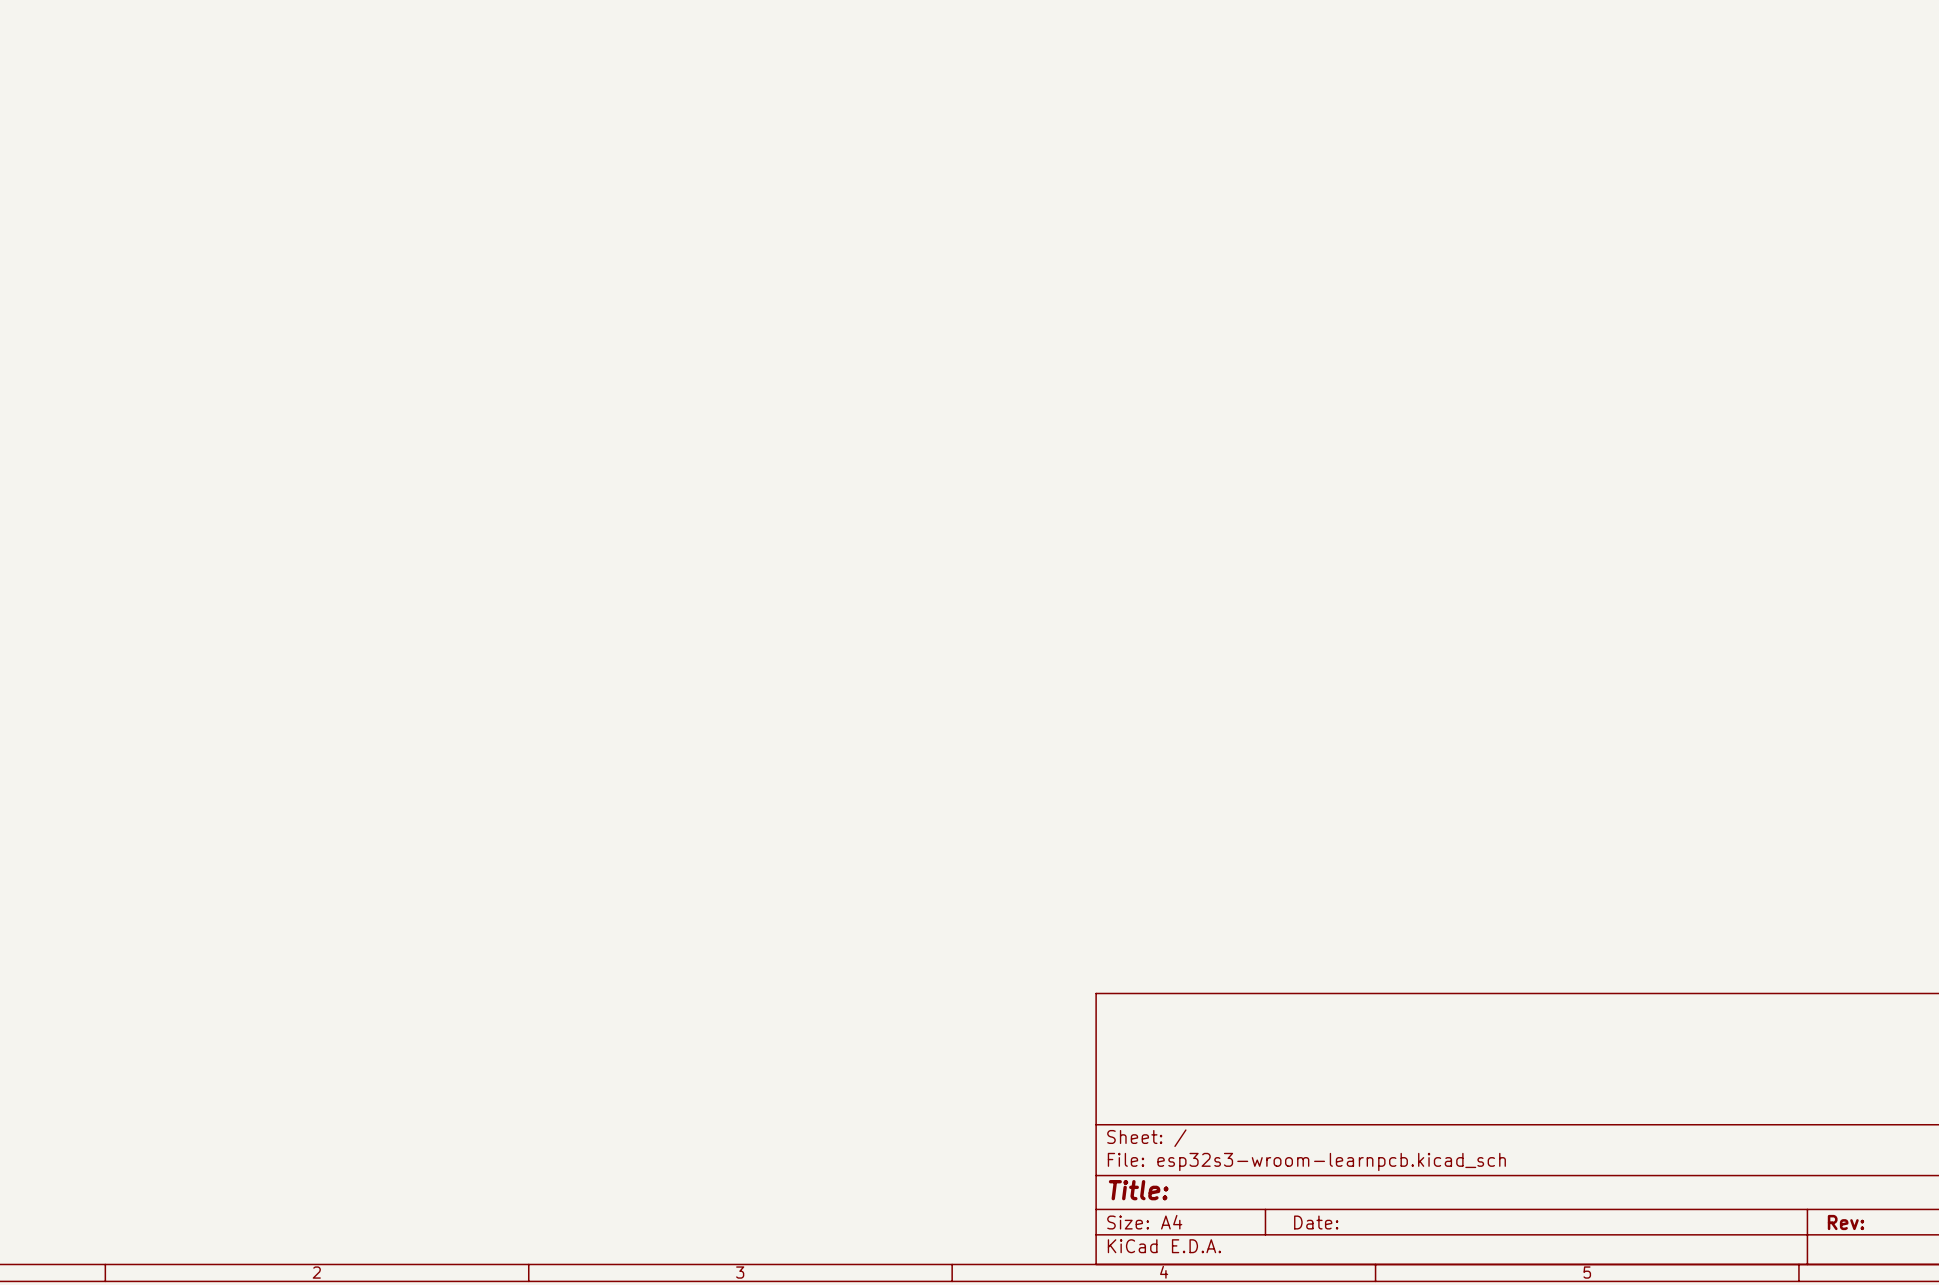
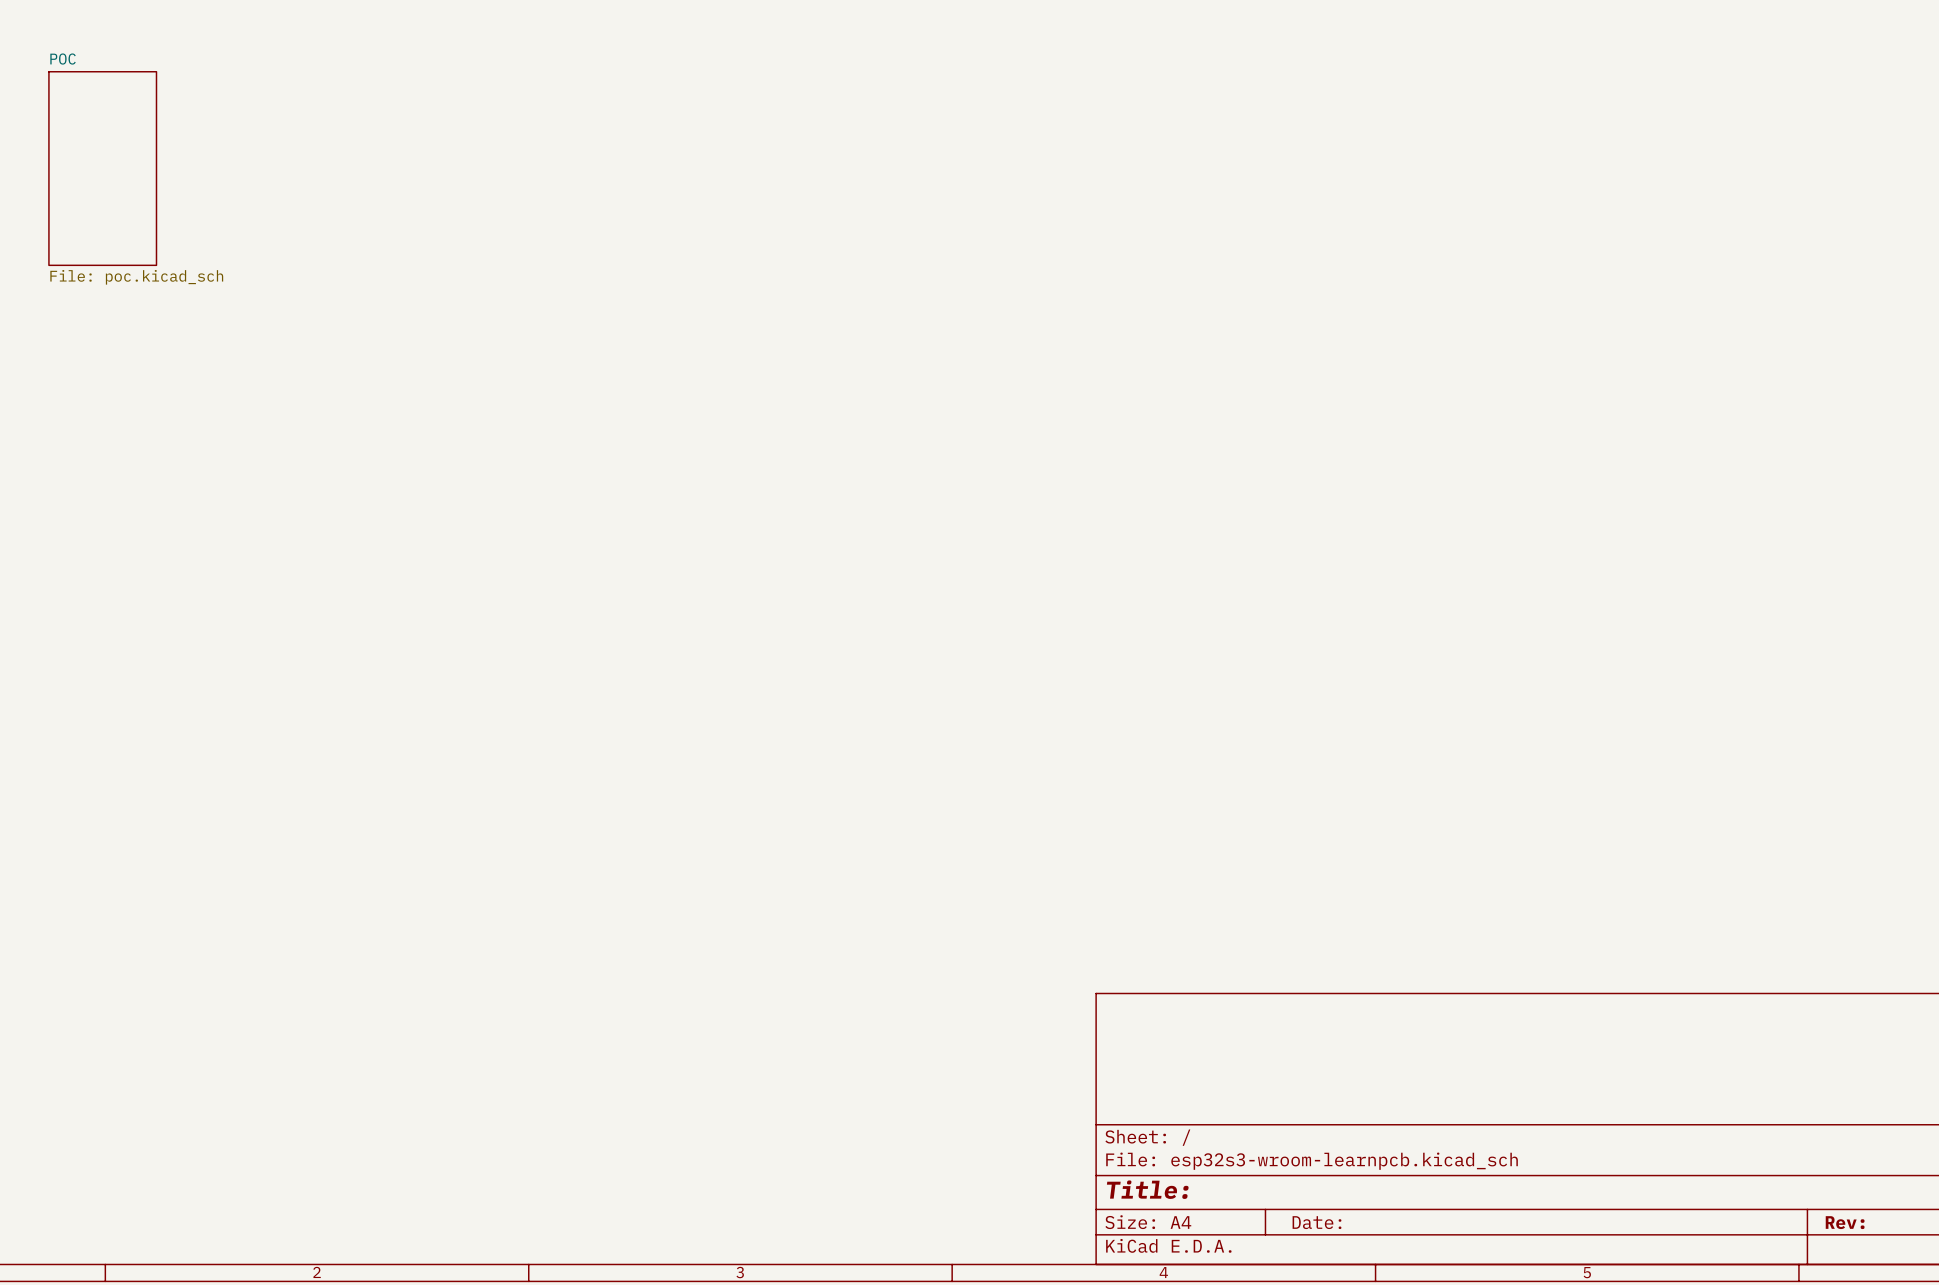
sheet POC: none -> File: poc.kicad_sch (102, 168)

